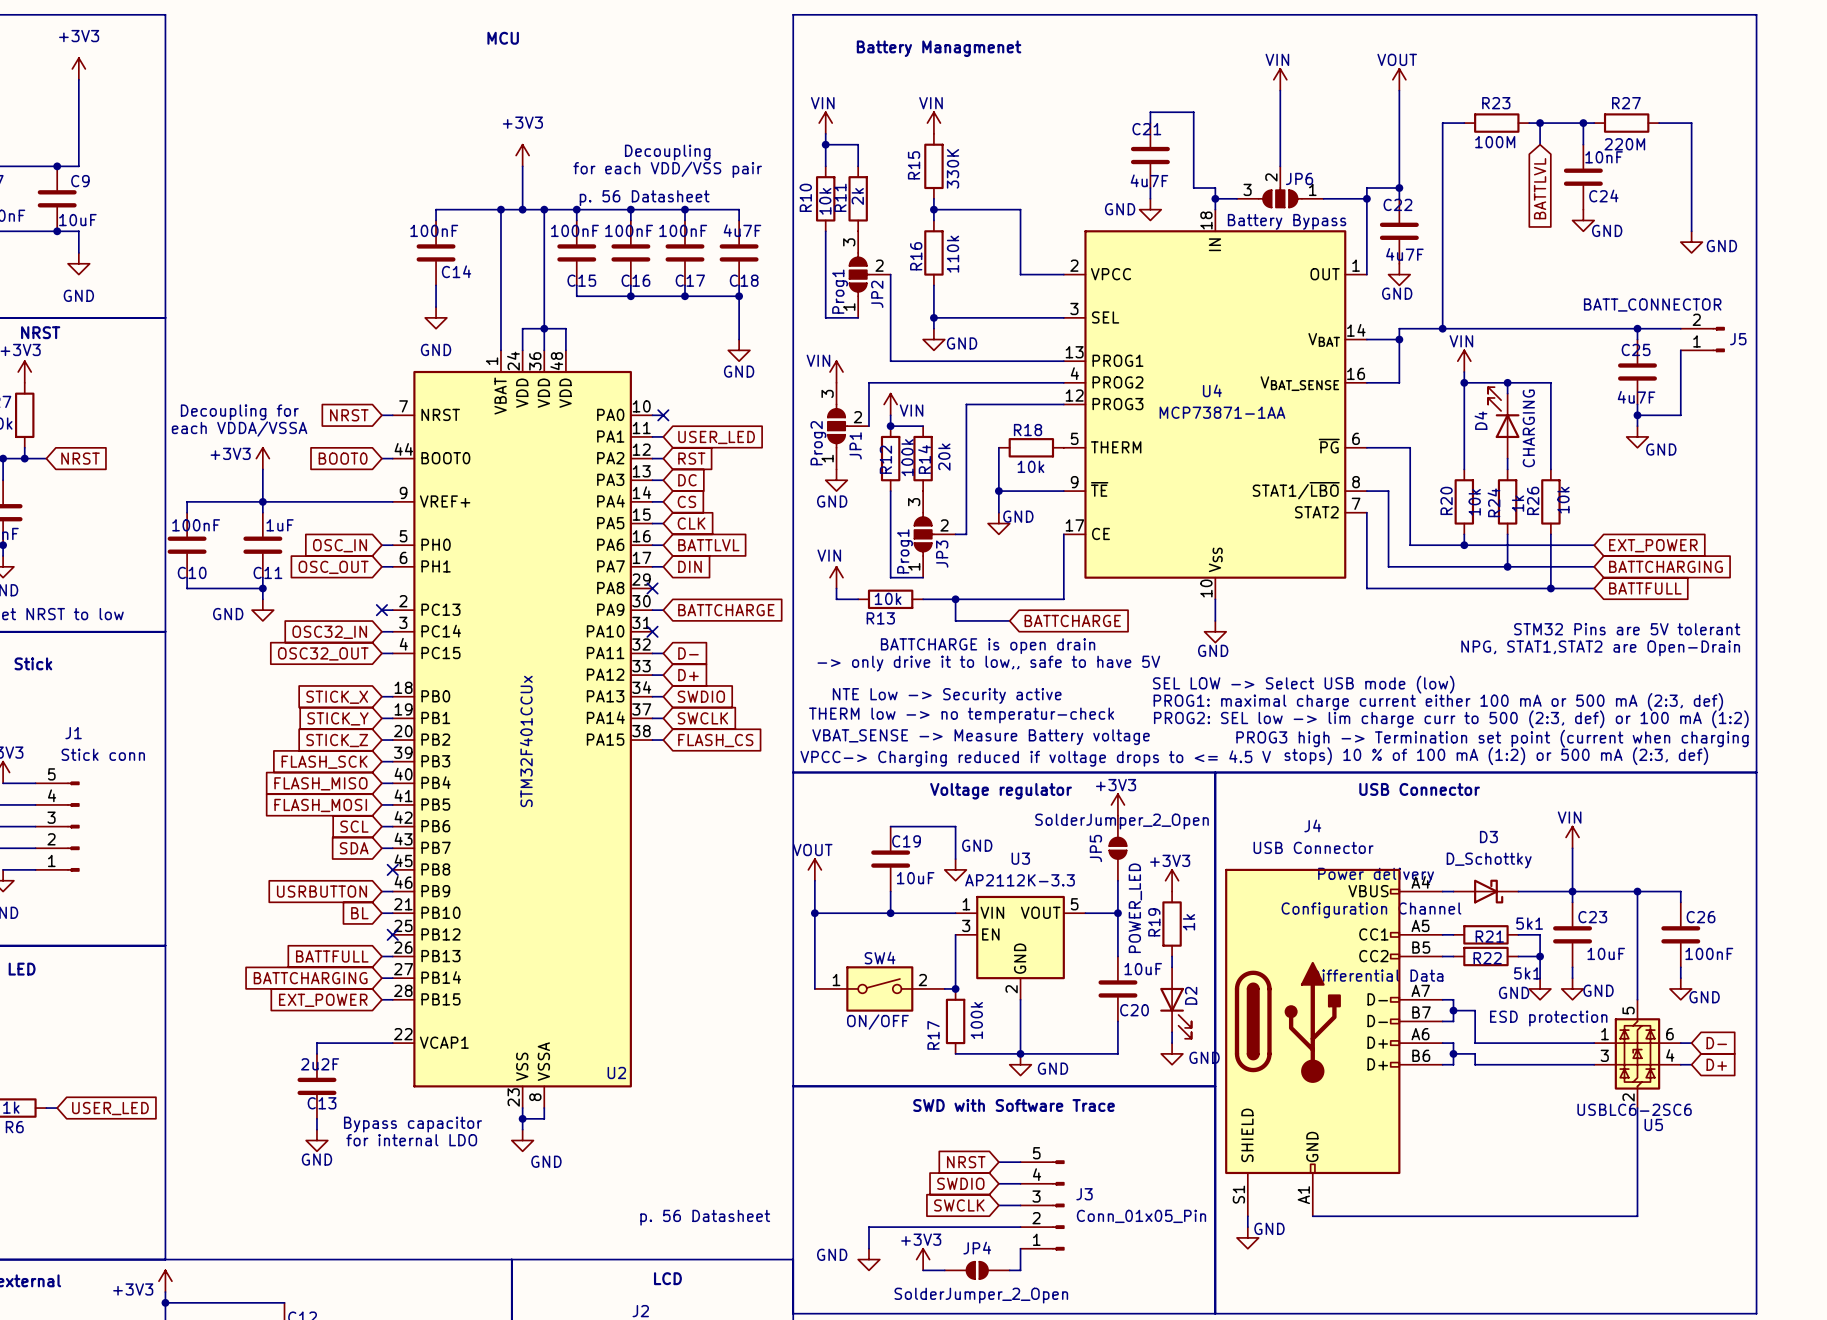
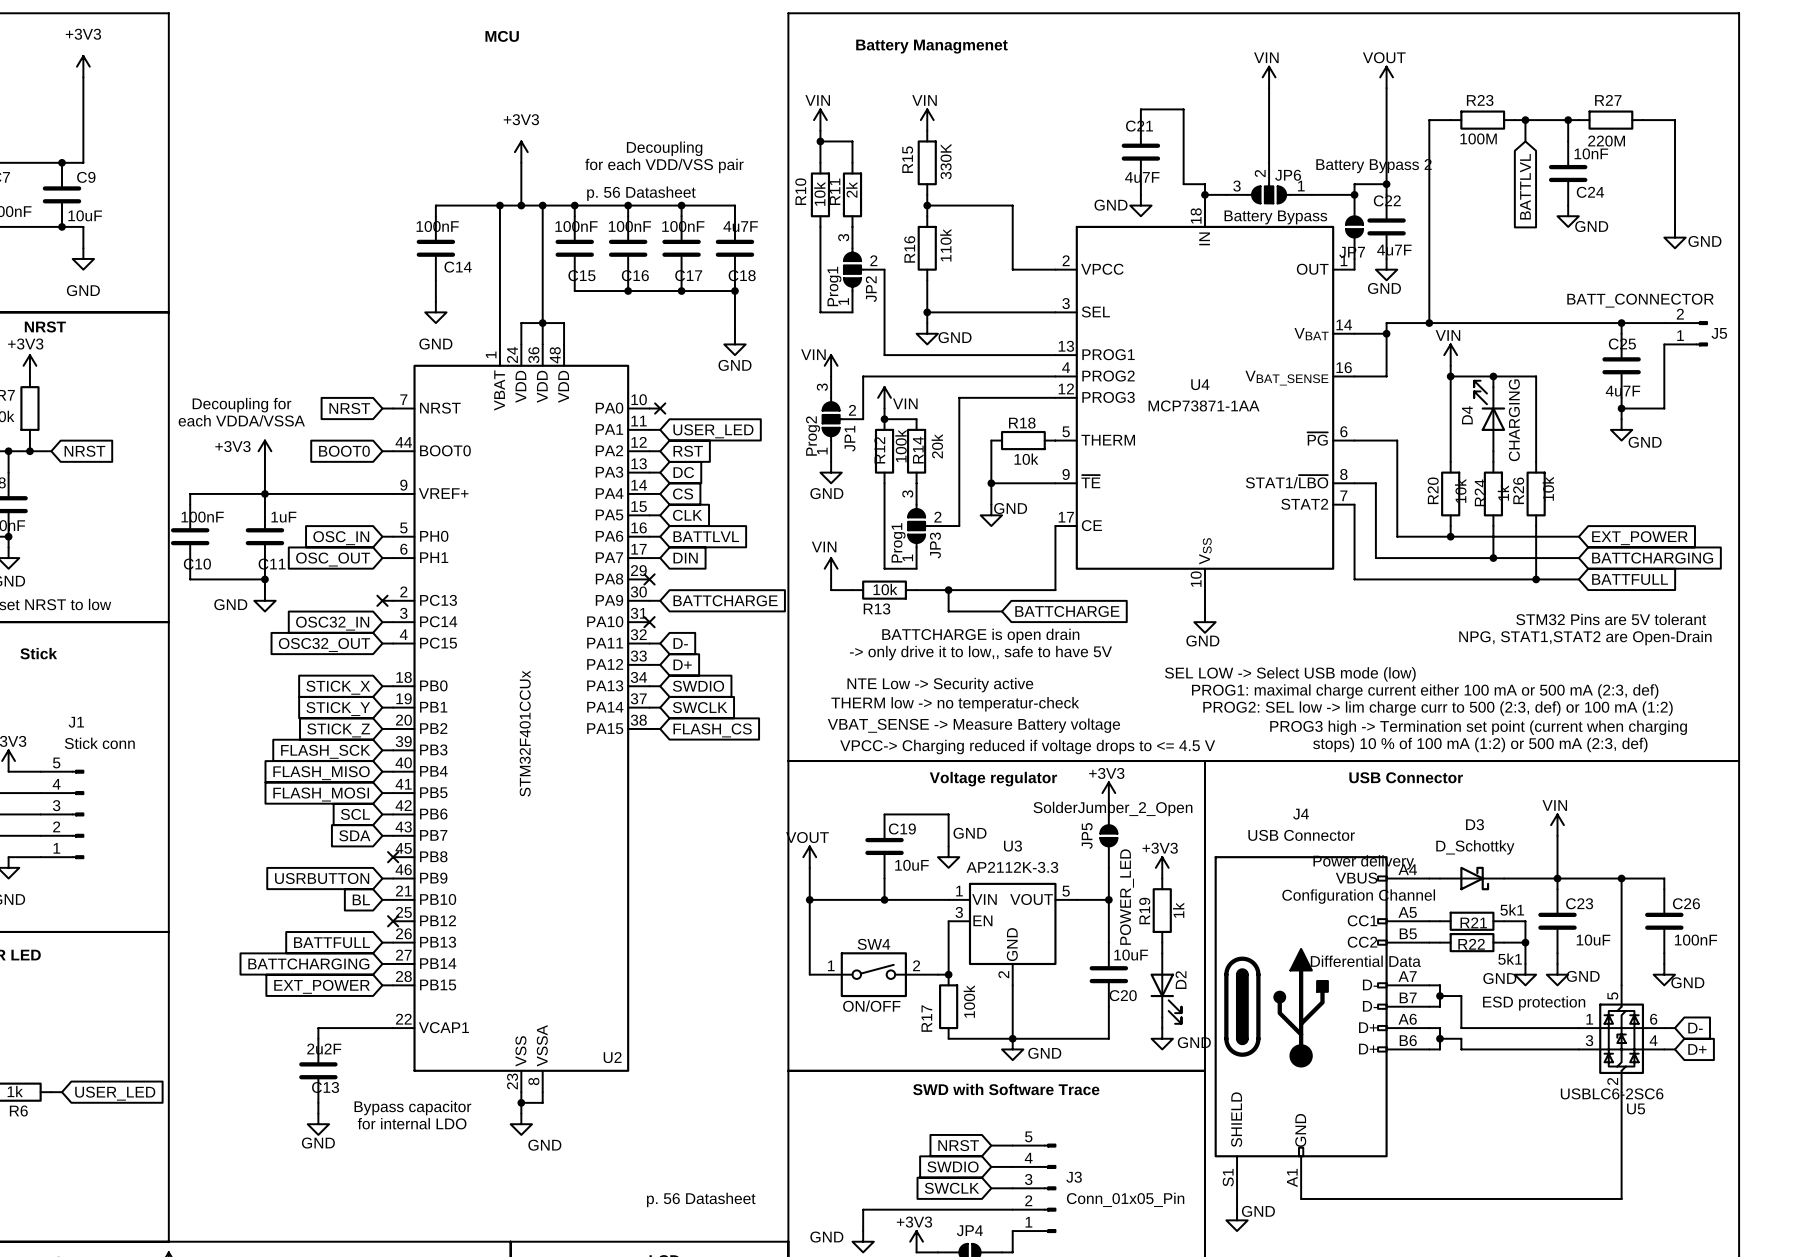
JP7: none -> Battery Bypass 2 (1354, 226)

